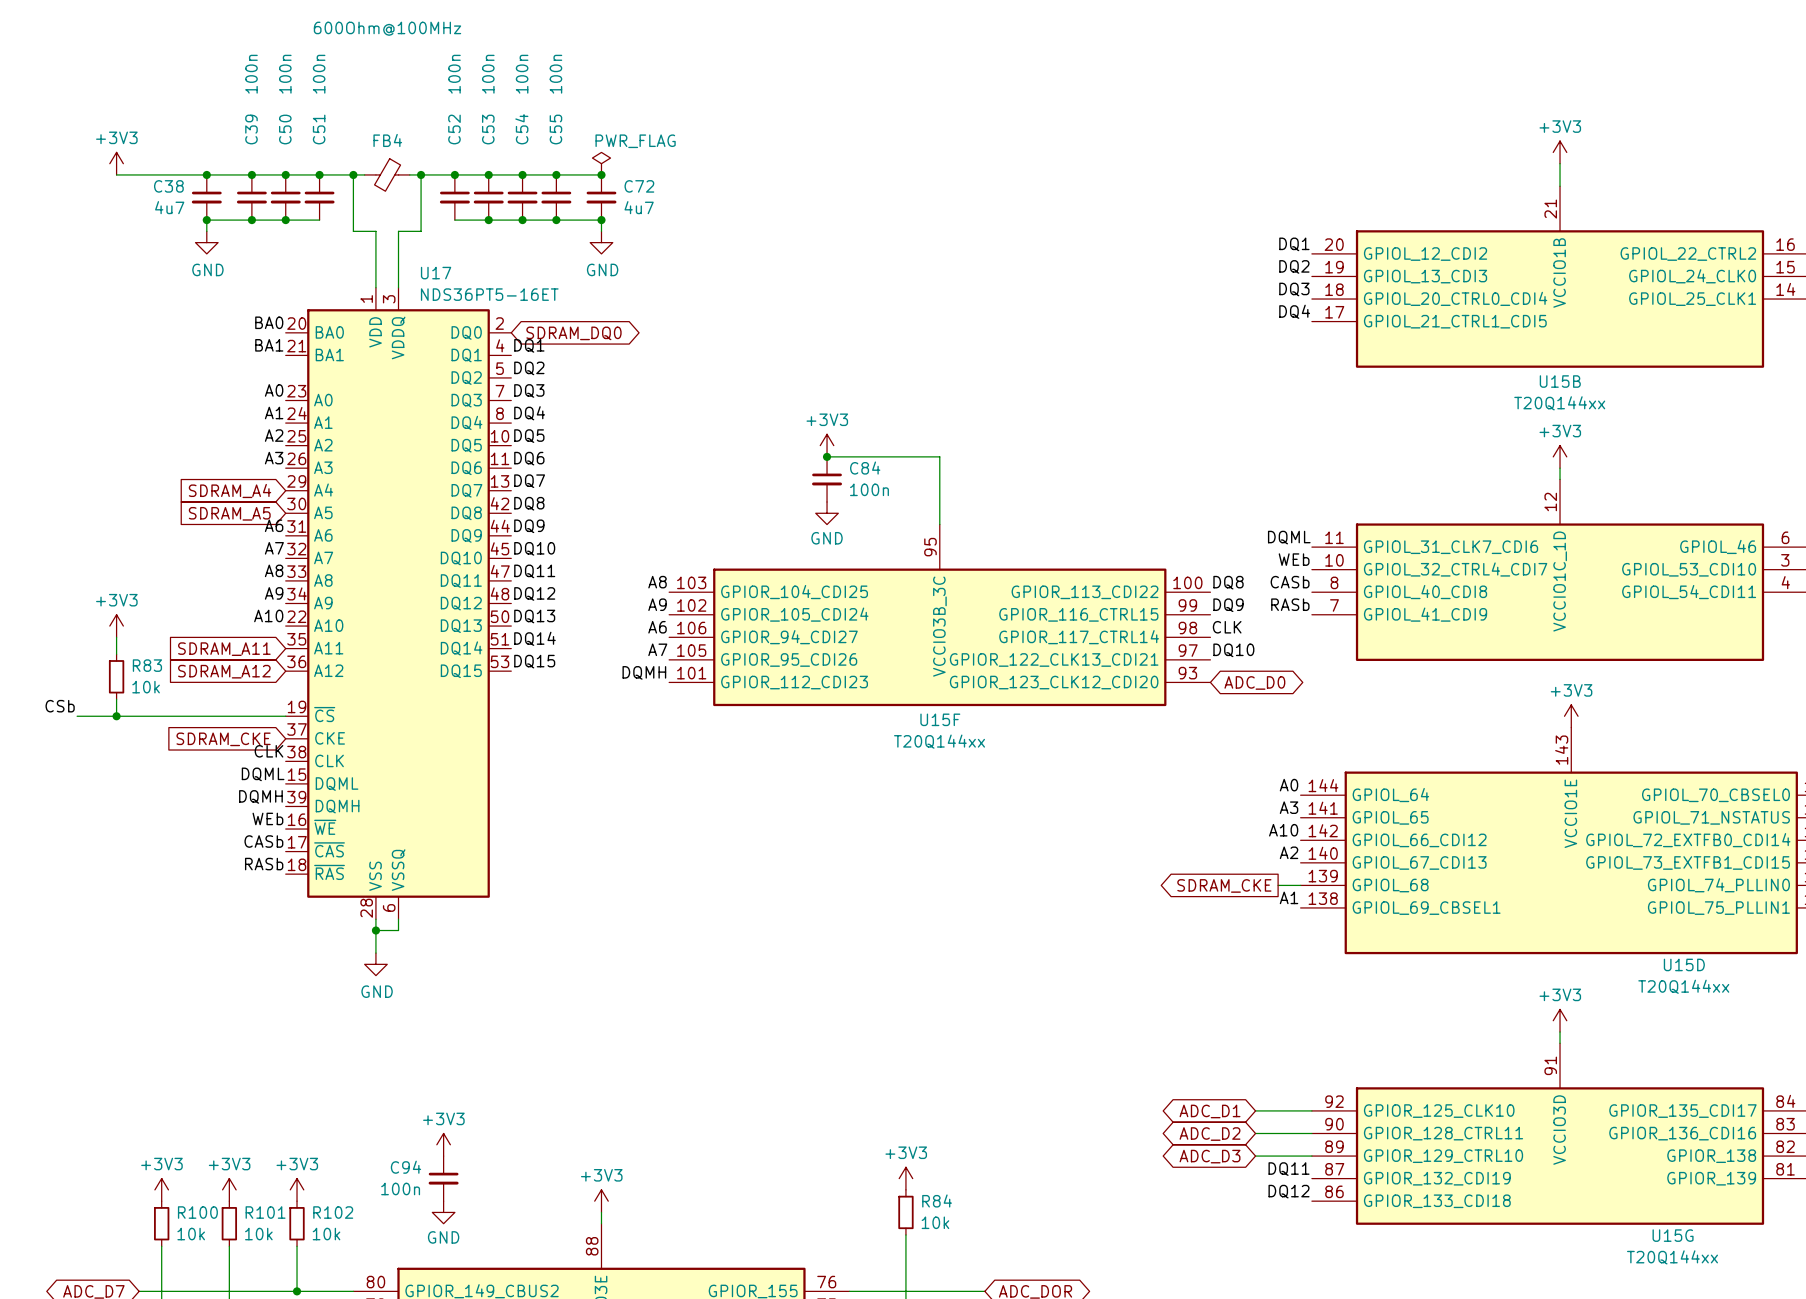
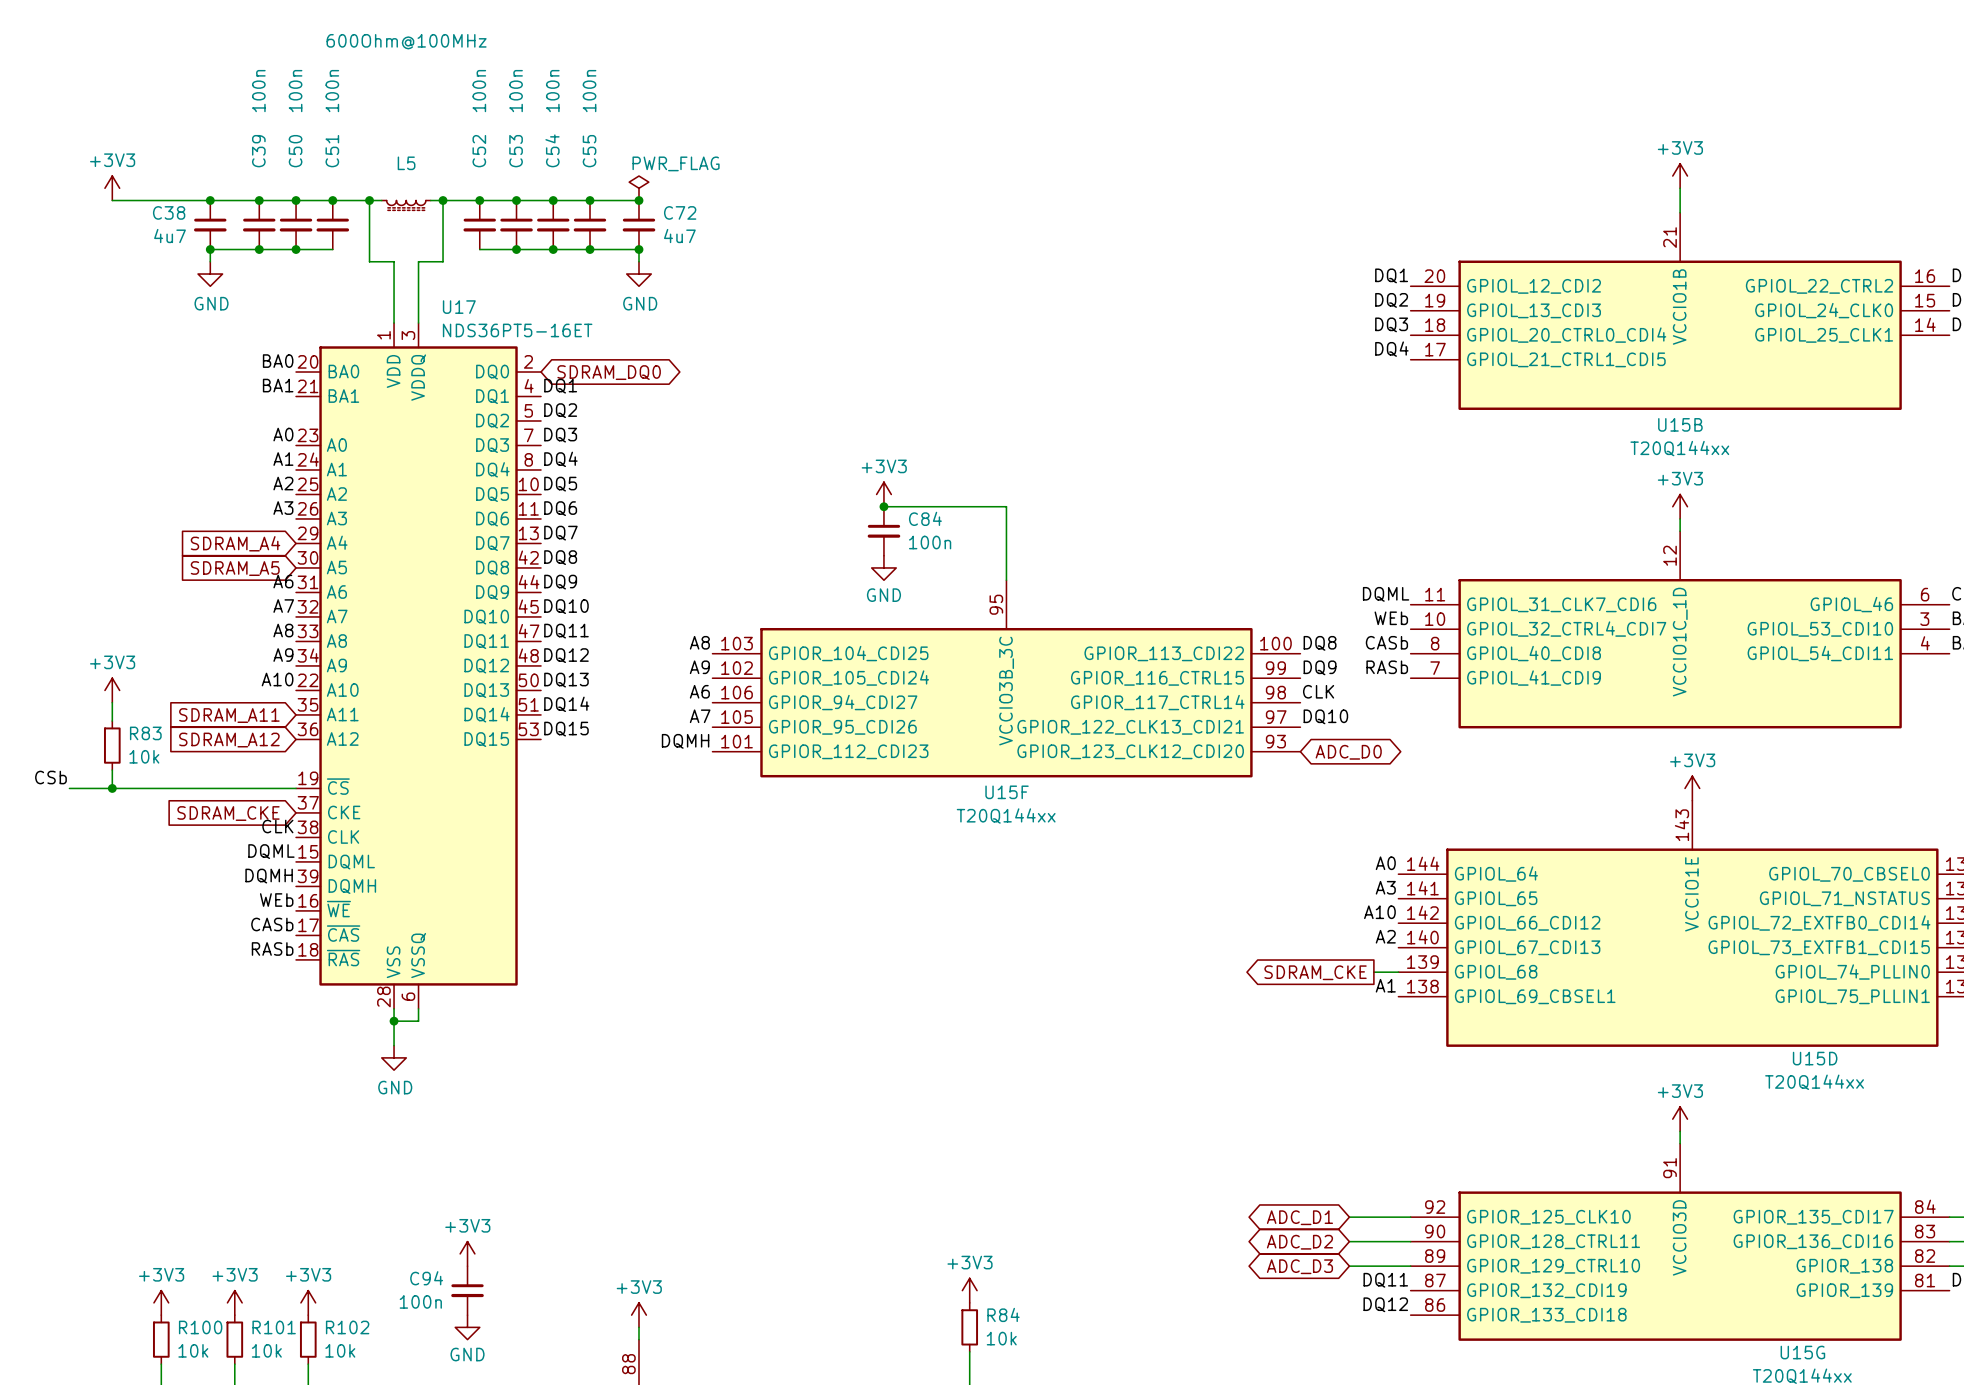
FB4: 600Ohm@100MHz (387, 174) -> none
L5: none -> 600Ohm@100MHz (406, 205)

